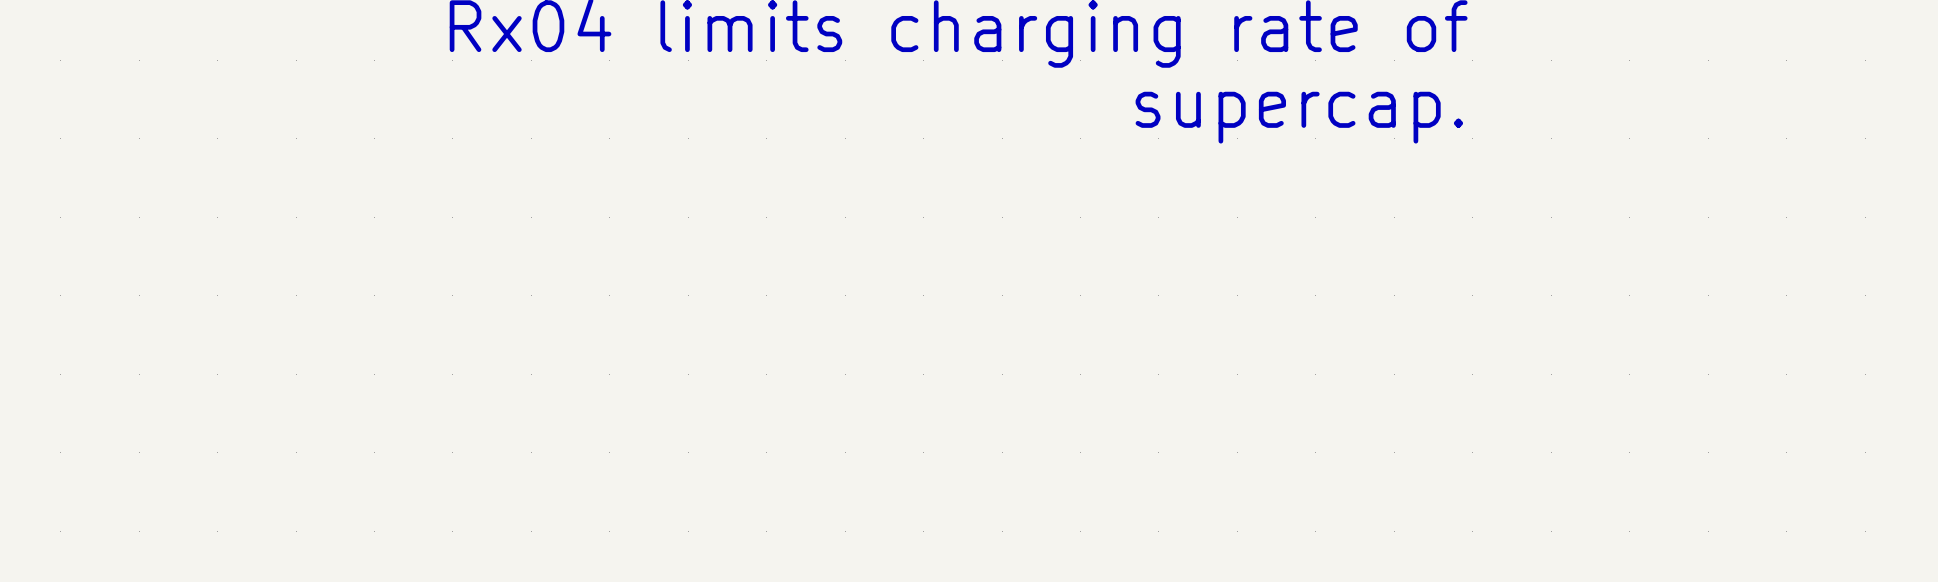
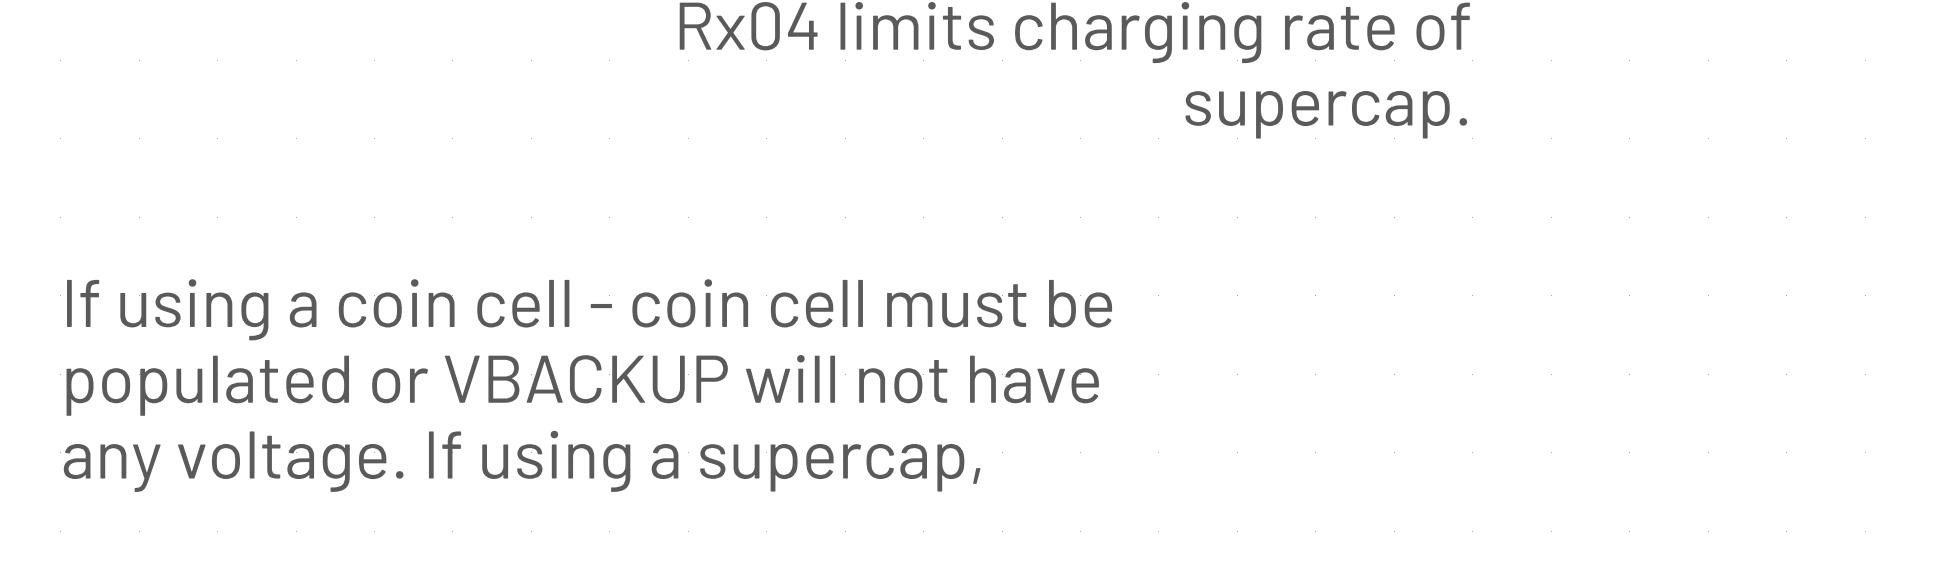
text: none -> If using a coin cell - coin cell must be (589, 309)
text: none -> populated or VBACKUP will not have (582, 385)
text: none -> any voltage. If using a supercap, (522, 461)

